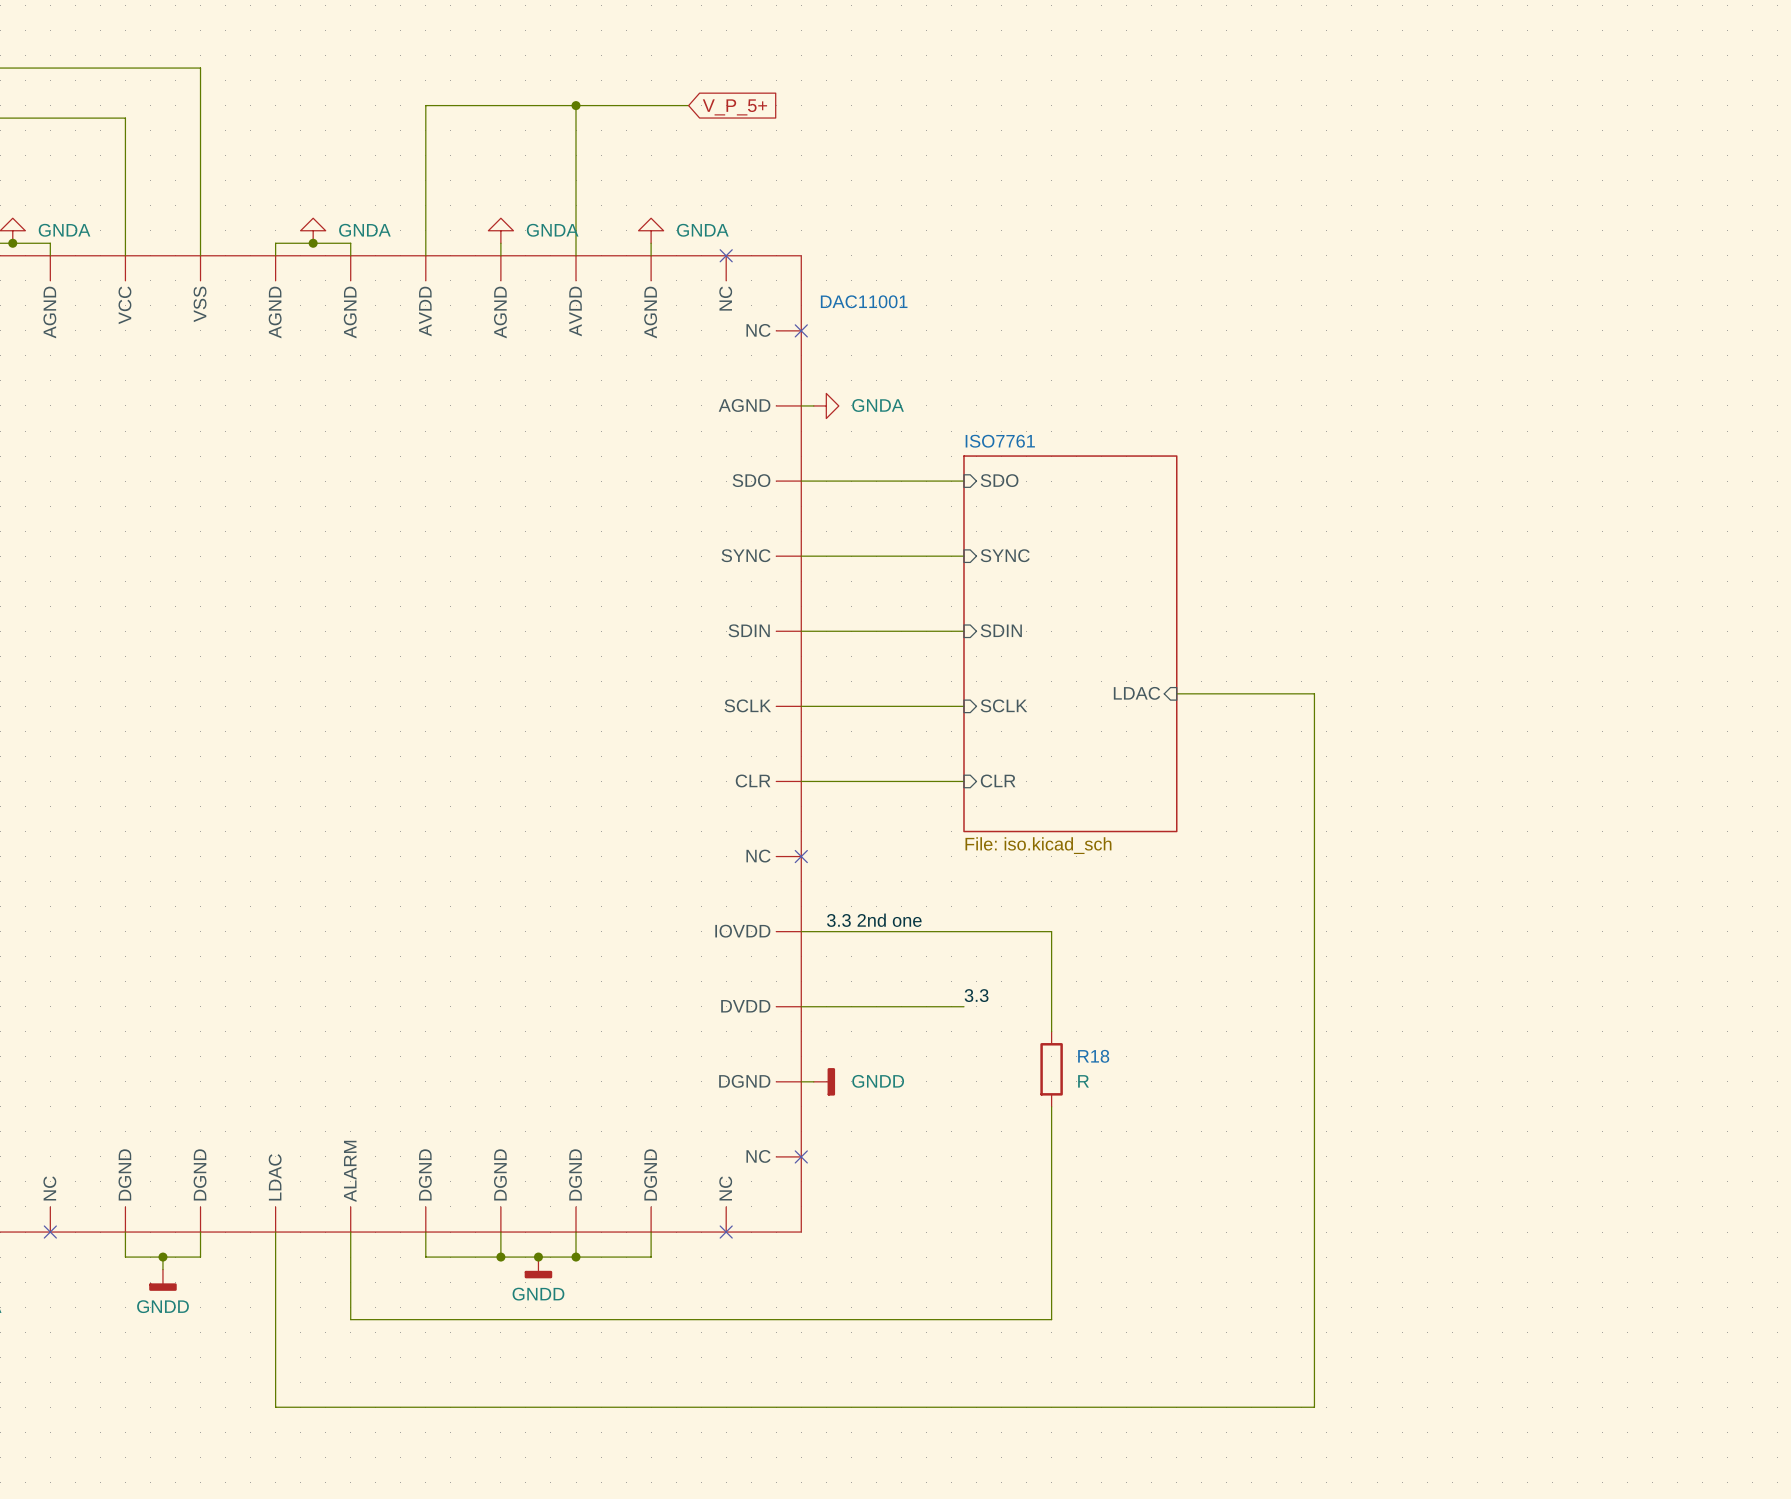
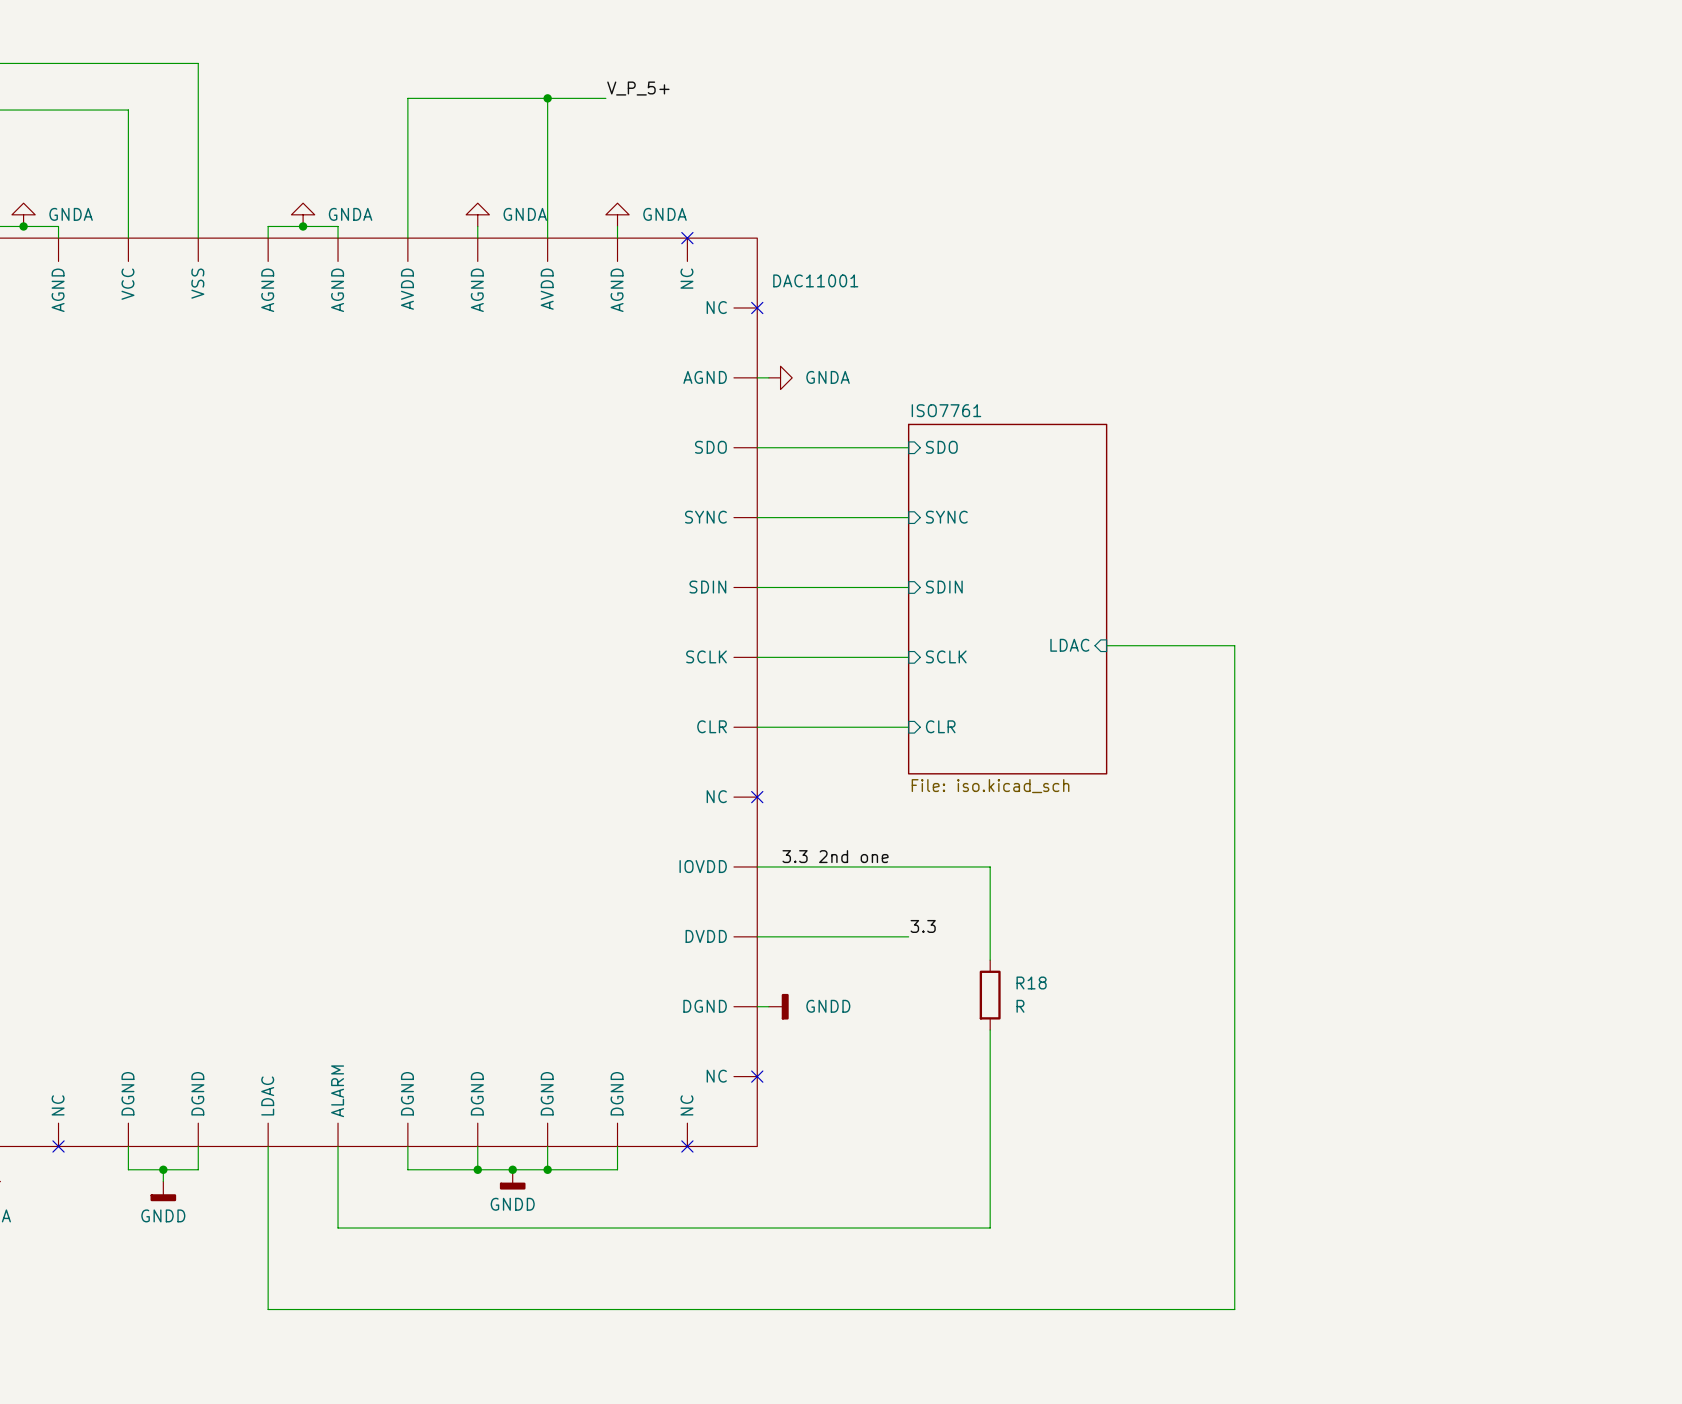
label: none -> V_P_5+ (638, 88)
wire: (638, 105) (688, 105) -> none
global label: V_P_5+ (734, 107) -> none

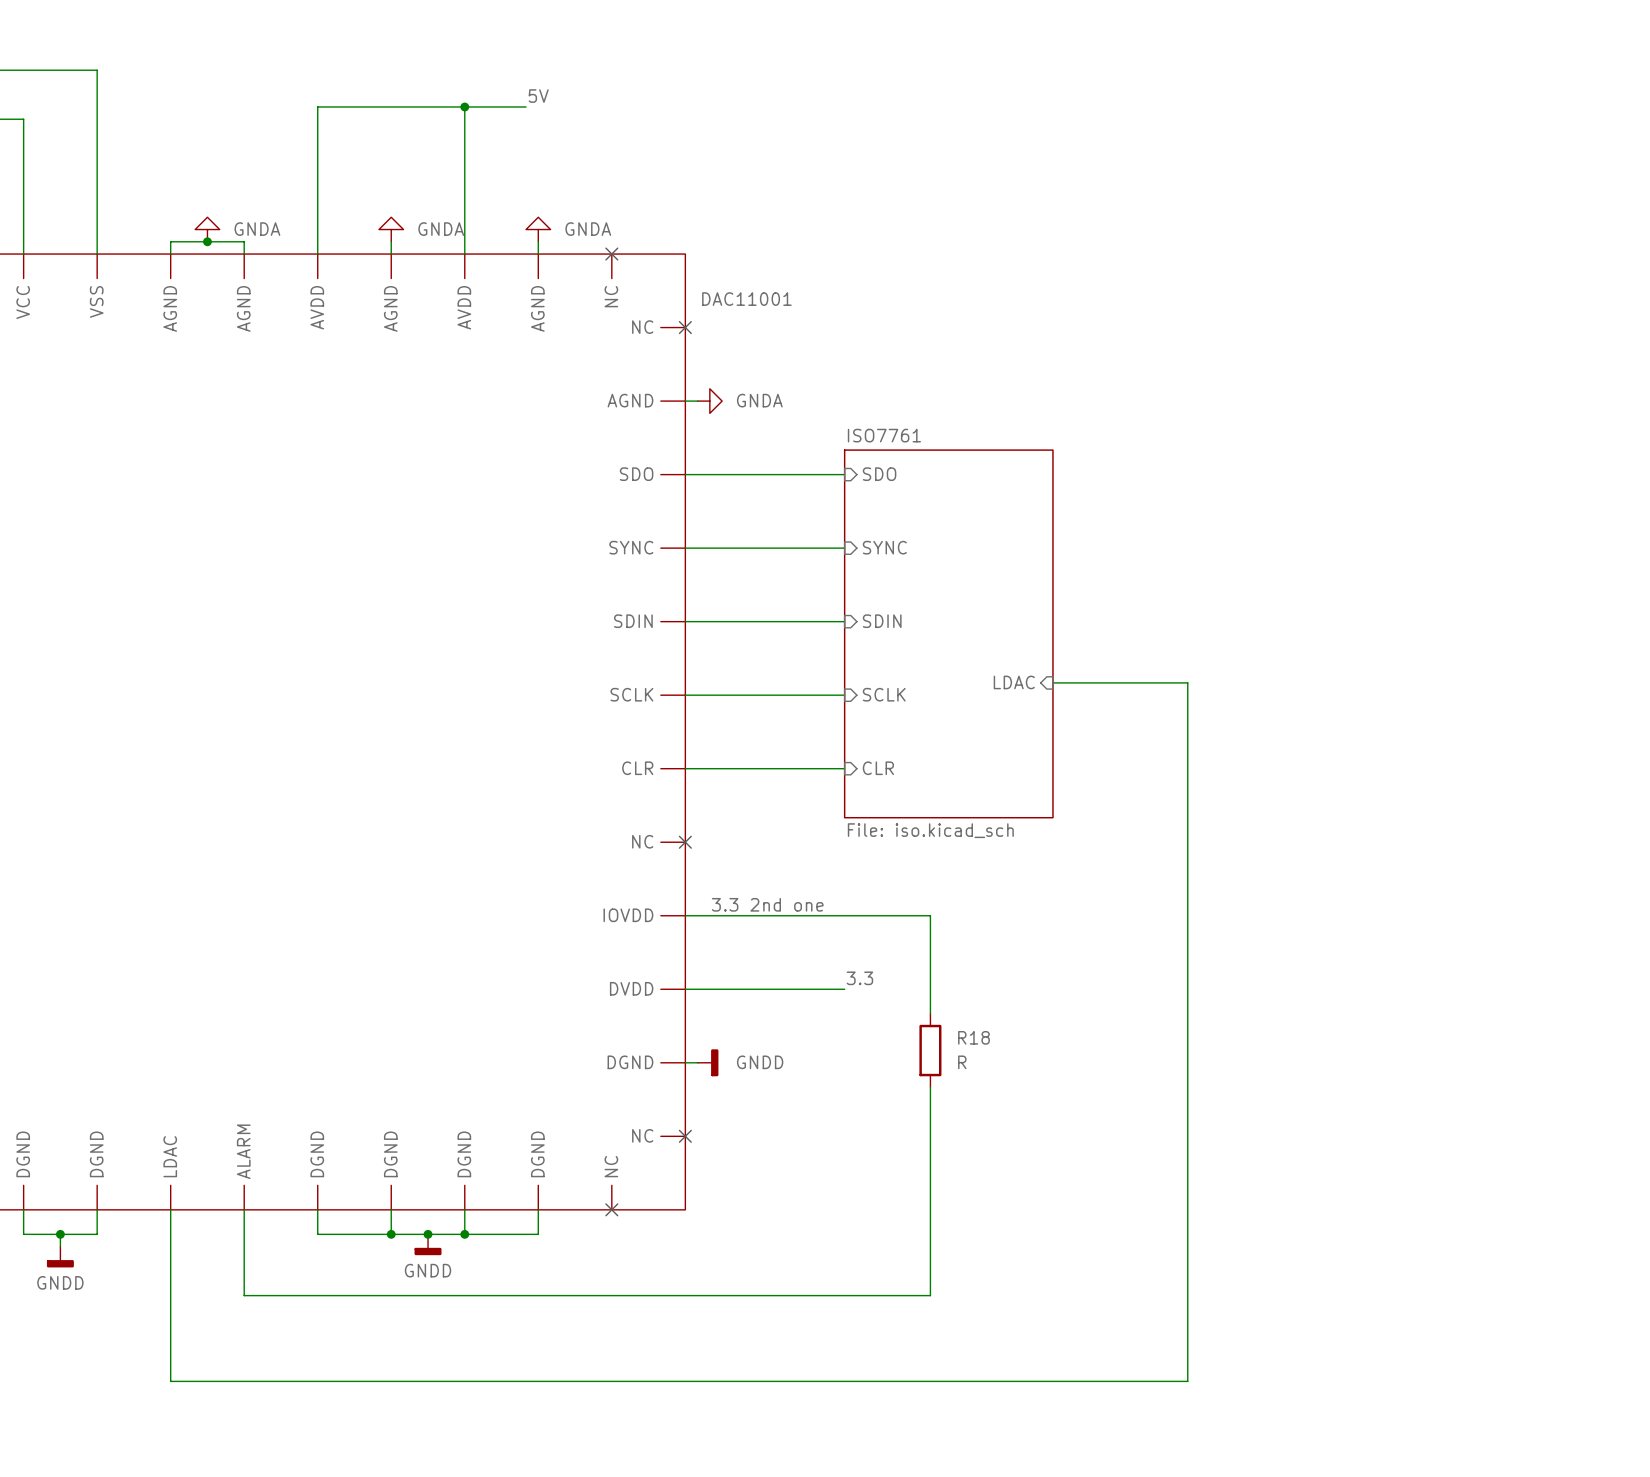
label: V_P_5+ (638, 88) -> 5V (538, 96)

